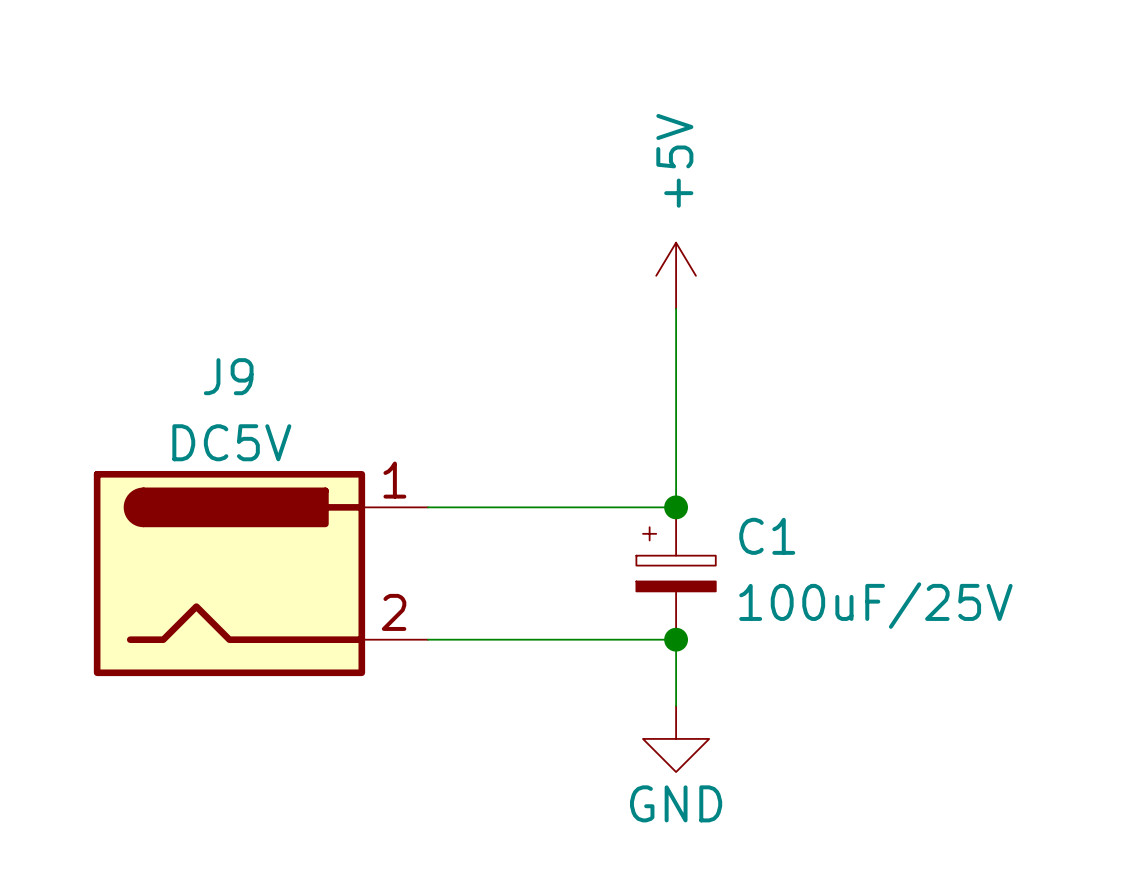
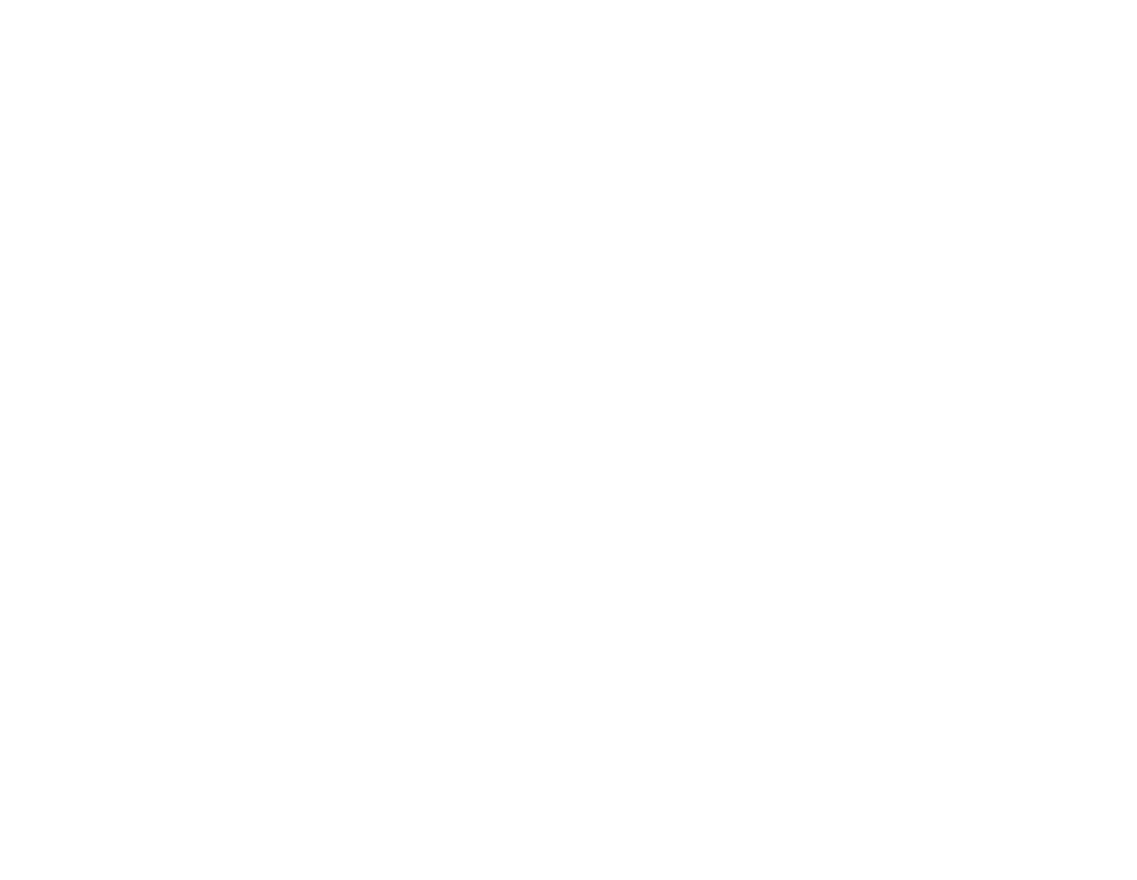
power symbol: +5V (676, 275) -> none
wire: (676, 308) (676, 507) (427, 507) -> none
junction: (676, 507) -> none
J9: DC5V (260, 573) -> none
C1: 100uF/25V (676, 573) -> none
wire: (427, 639) (676, 639) (676, 705) -> none
junction: (676, 639) -> none
power symbol: GND (676, 738) -> none

